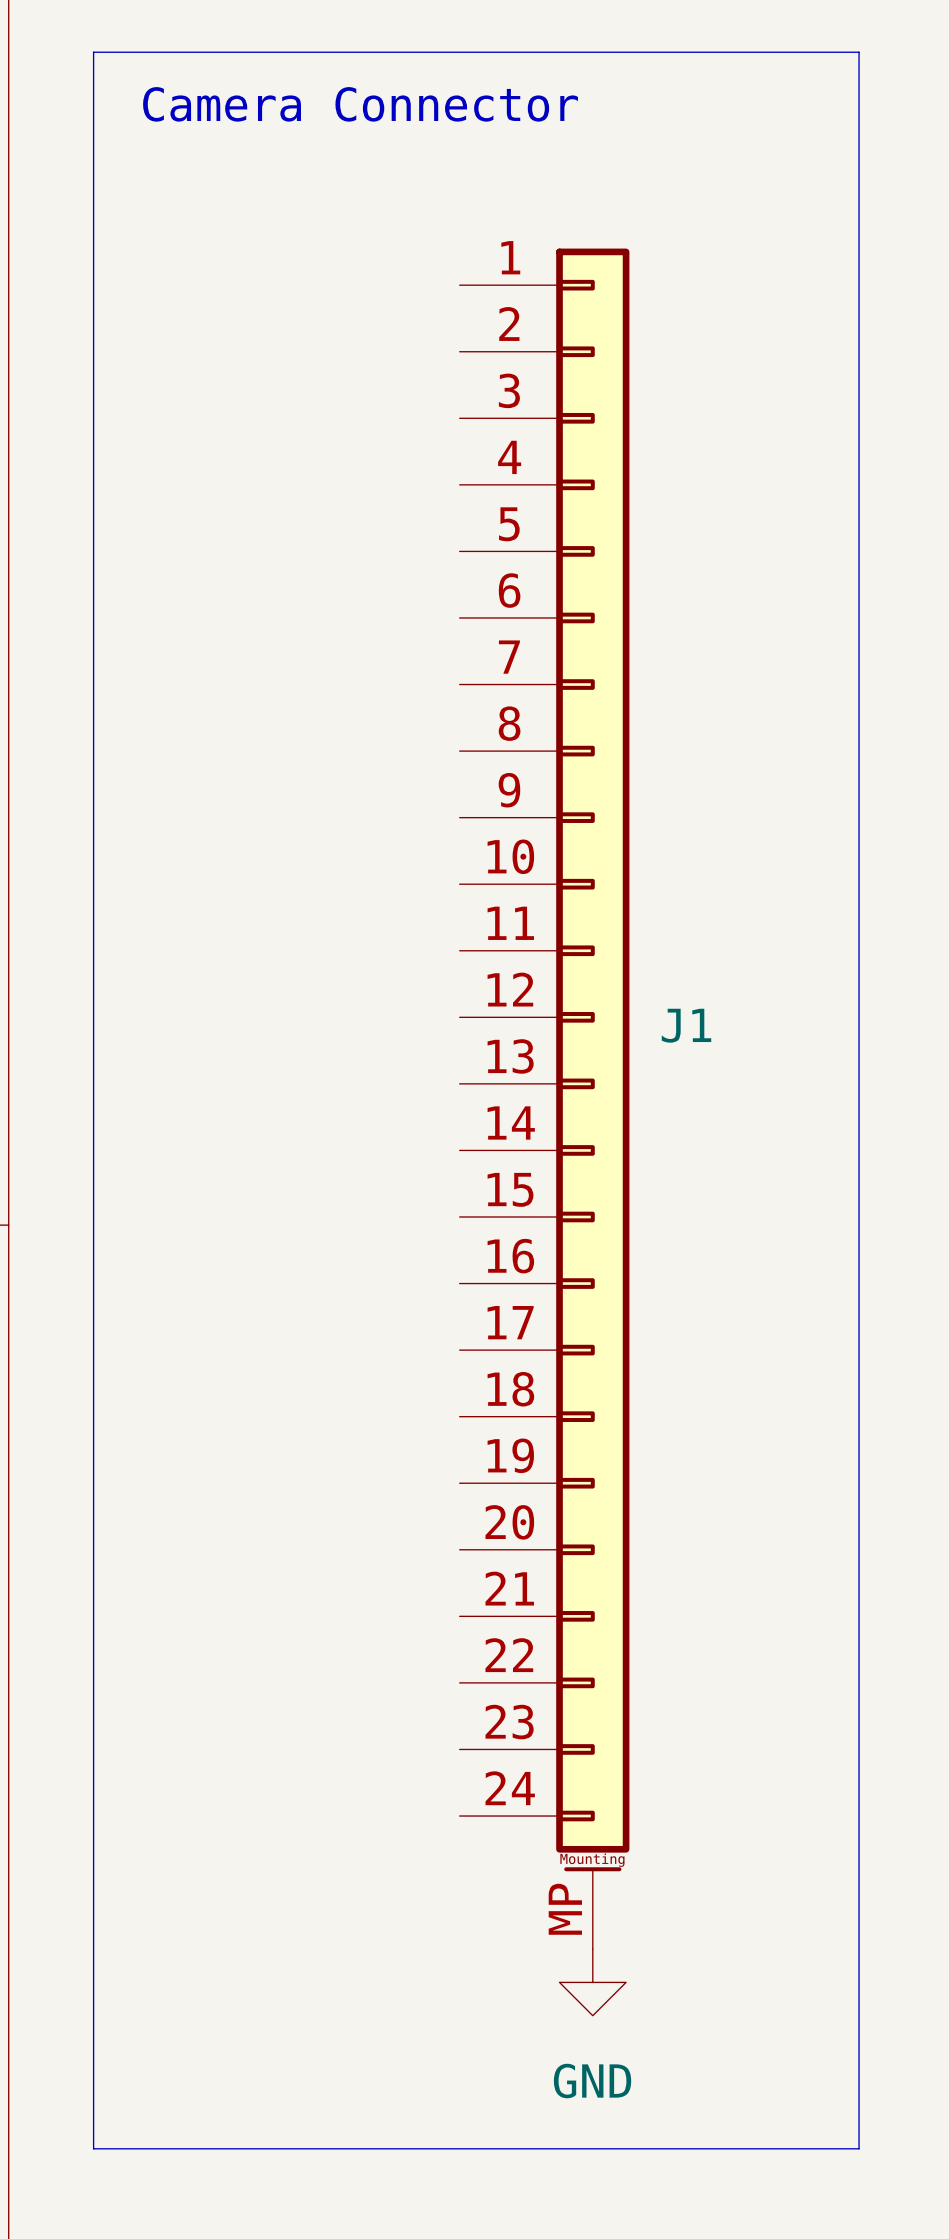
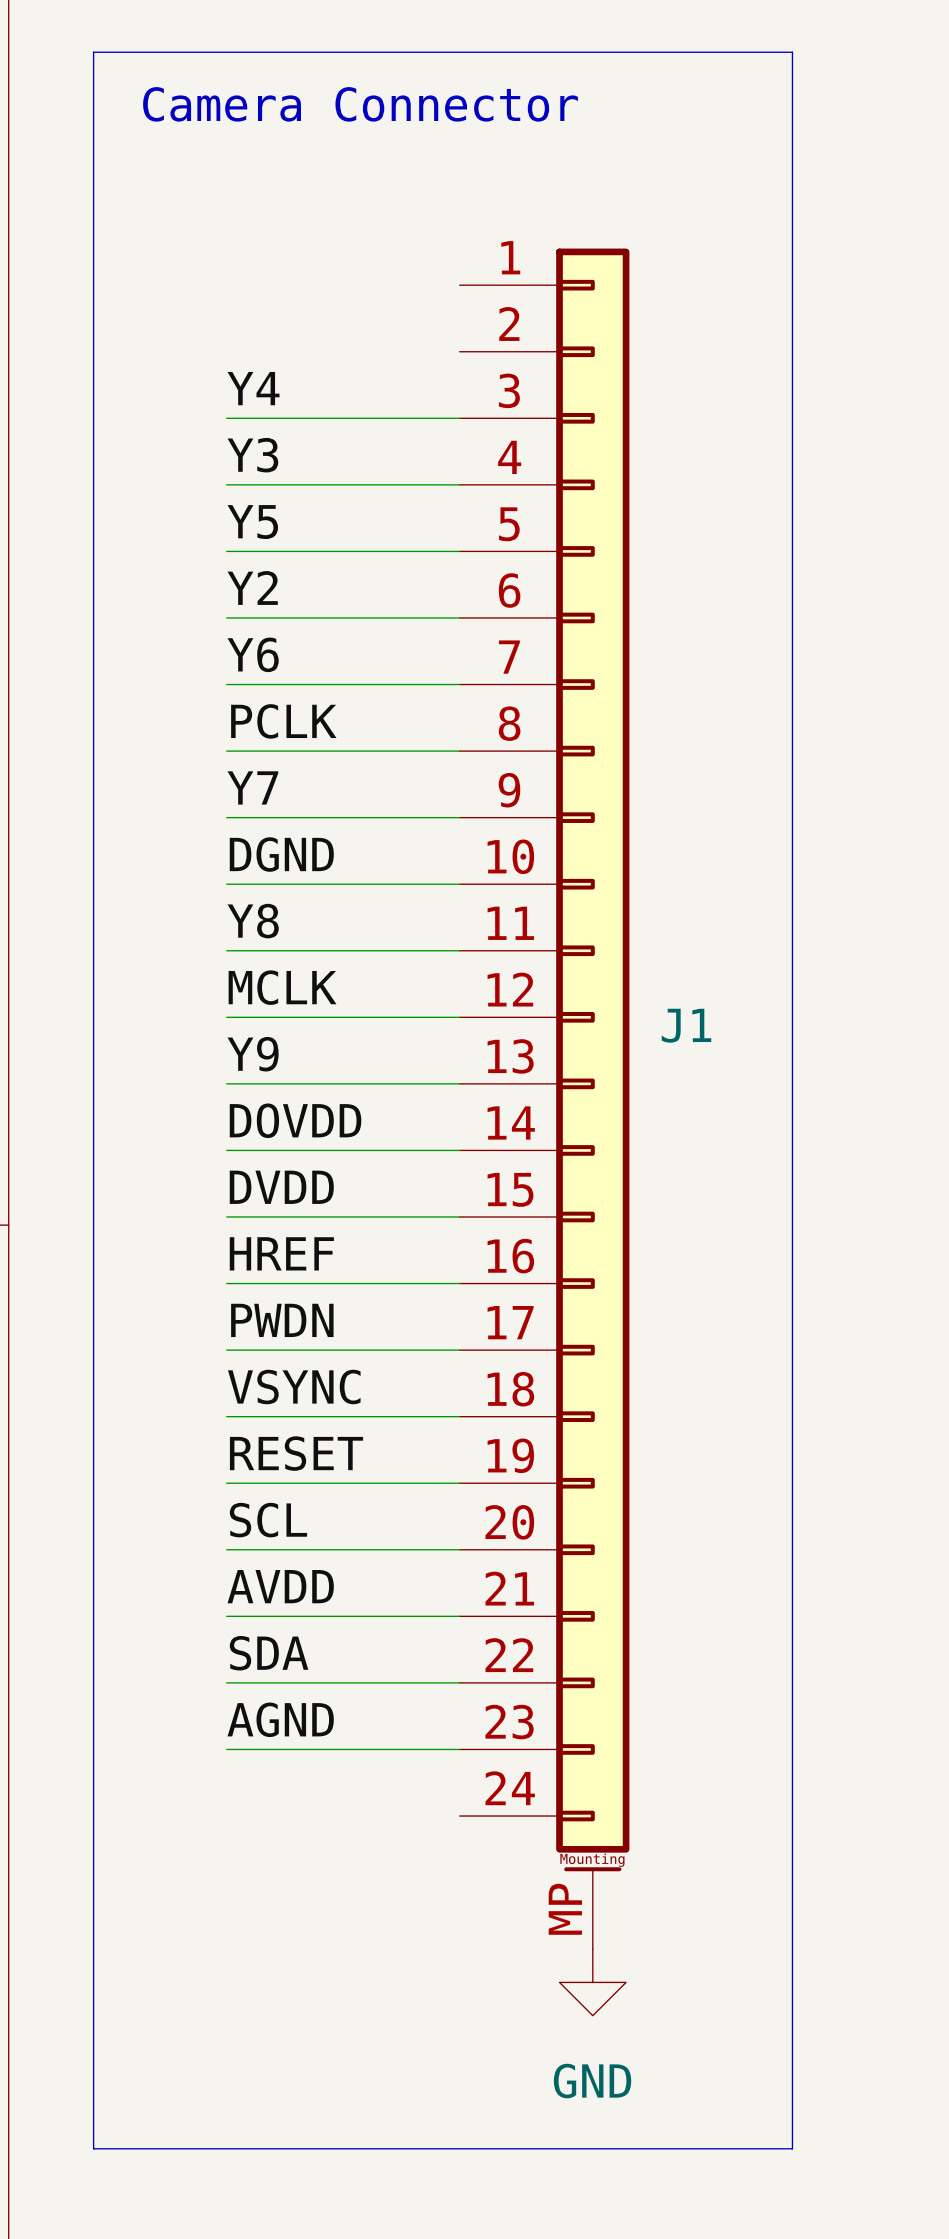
line: (792, 52) (859, 52) (859, 2148) (792, 2148) -> (792, 52) (792, 2148)
label: none -> Y4 (253, 388)
wire: none -> (226, 418) (459, 418)
label: none -> Y3 (252, 455)
wire: none -> (226, 484) (459, 484)
label: none -> Y5 (252, 522)
wire: none -> (226, 551) (459, 551)
label: none -> Y2 (252, 587)
wire: none -> (226, 617) (459, 617)
label: none -> Y6 (253, 654)
wire: none -> (226, 684) (459, 684)
label: none -> PCLK (283, 721)
wire: none -> (226, 751) (459, 751)
label: none -> Y7 (252, 787)
wire: none -> (226, 817) (459, 817)
label: none -> DGND (281, 854)
wire: none -> (226, 884) (459, 884)
label: none -> Y8 (253, 921)
wire: none -> (226, 950) (459, 950)
label: none -> MCLK (282, 987)
wire: none -> (226, 1017) (459, 1017)
label: none -> Y9 (253, 1054)
wire: none -> (226, 1083) (459, 1083)
label: none -> DOVDD (295, 1120)
wire: none -> (226, 1150) (459, 1150)
label: none -> DVDD (281, 1187)
wire: none -> (226, 1216) (459, 1216)
label: none -> HREF (281, 1253)
wire: none -> (226, 1283) (459, 1283)
label: none -> PWDN (282, 1320)
wire: none -> (226, 1350) (459, 1350)
label: none -> VSYNC (294, 1386)
wire: none -> (226, 1416) (459, 1416)
label: none -> RESET (296, 1453)
wire: none -> (226, 1483) (459, 1483)
label: none -> SCL (268, 1520)
wire: none -> (226, 1549) (459, 1549)
label: none -> AVDD (280, 1586)
wire: none -> (226, 1616) (459, 1616)
label: none -> SDA (269, 1653)
wire: none -> (226, 1682) (459, 1682)
label: none -> AGND (280, 1719)
wire: none -> (226, 1749) (459, 1749)

